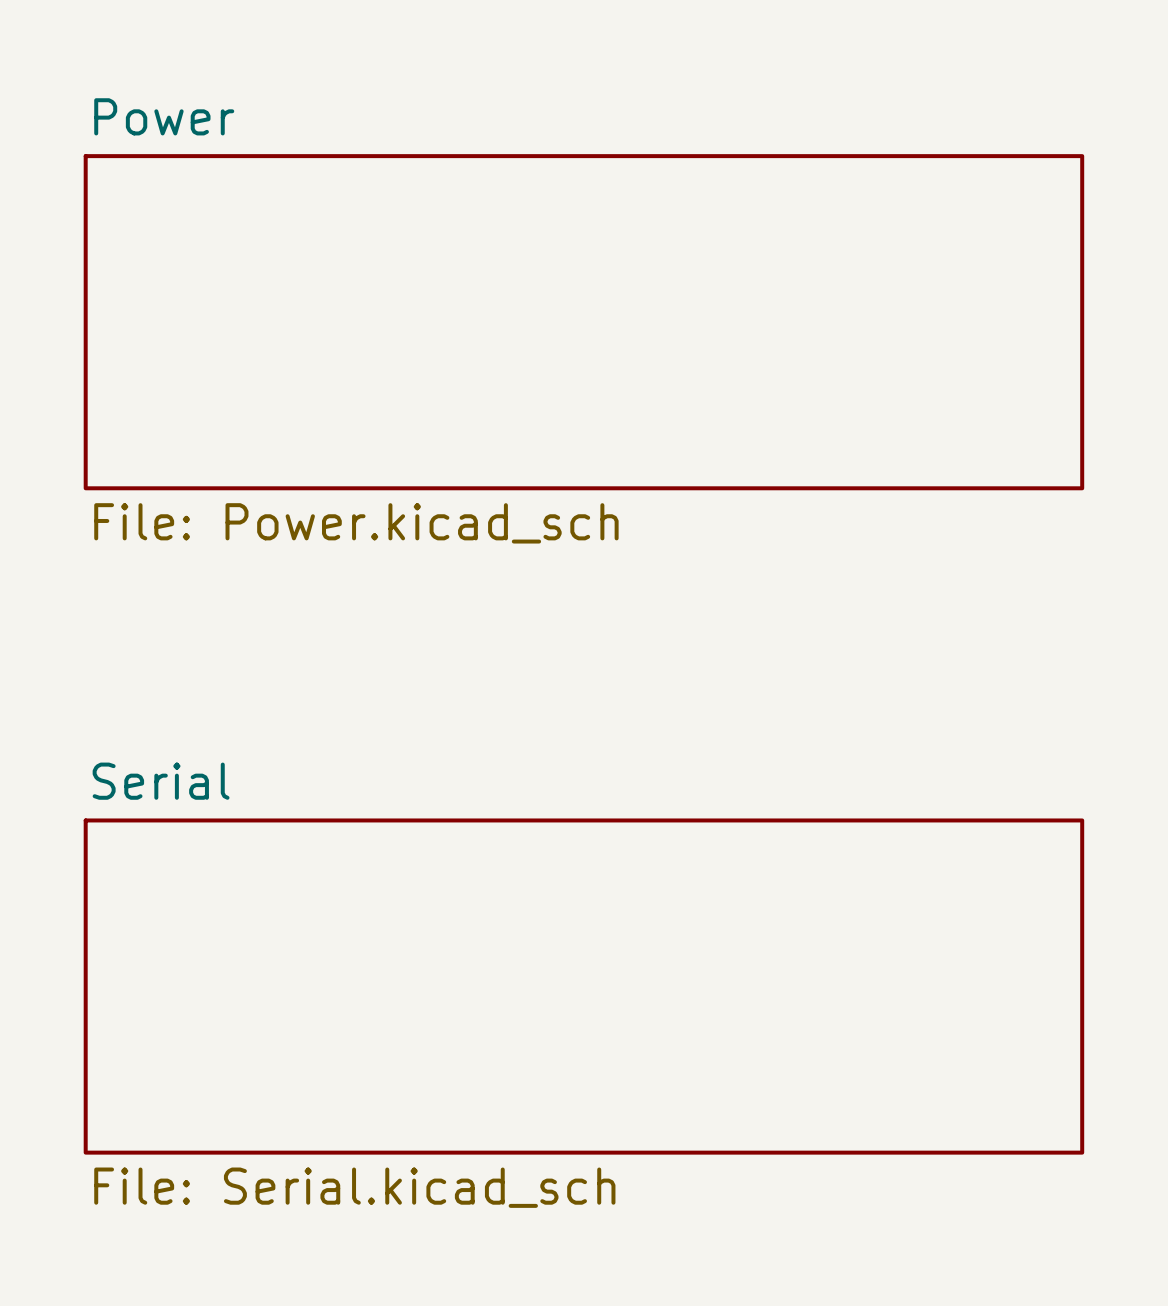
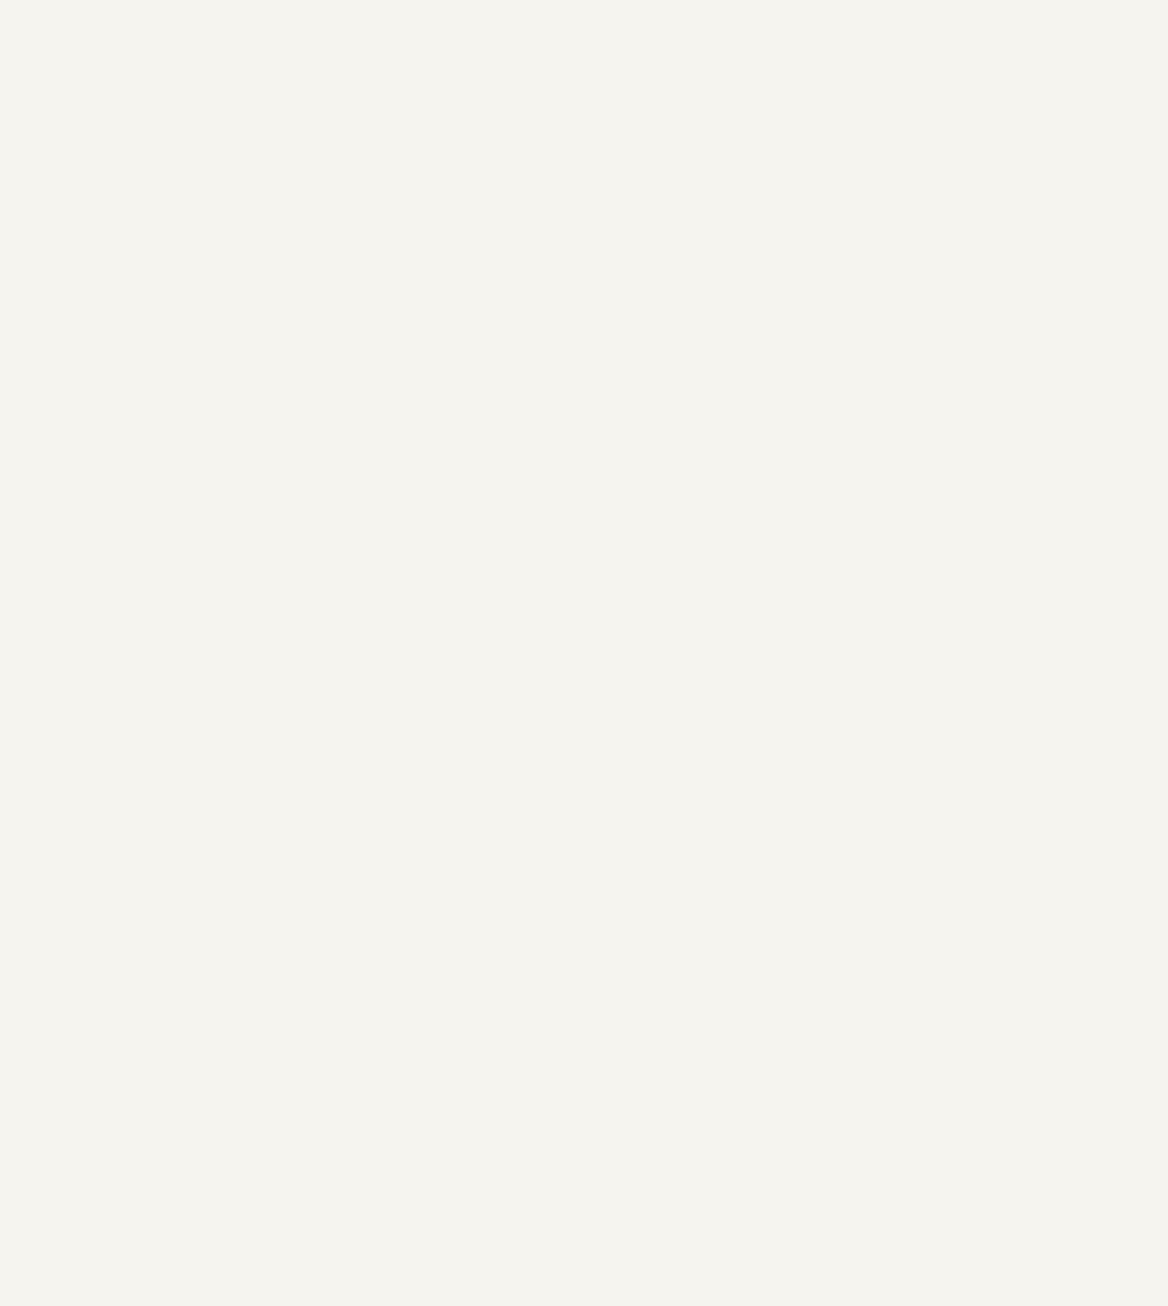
sheet Power: File: Power.kicad_sch (583, 322) -> none
sheet Serial: File: Serial.kicad_sch (583, 986) -> none

